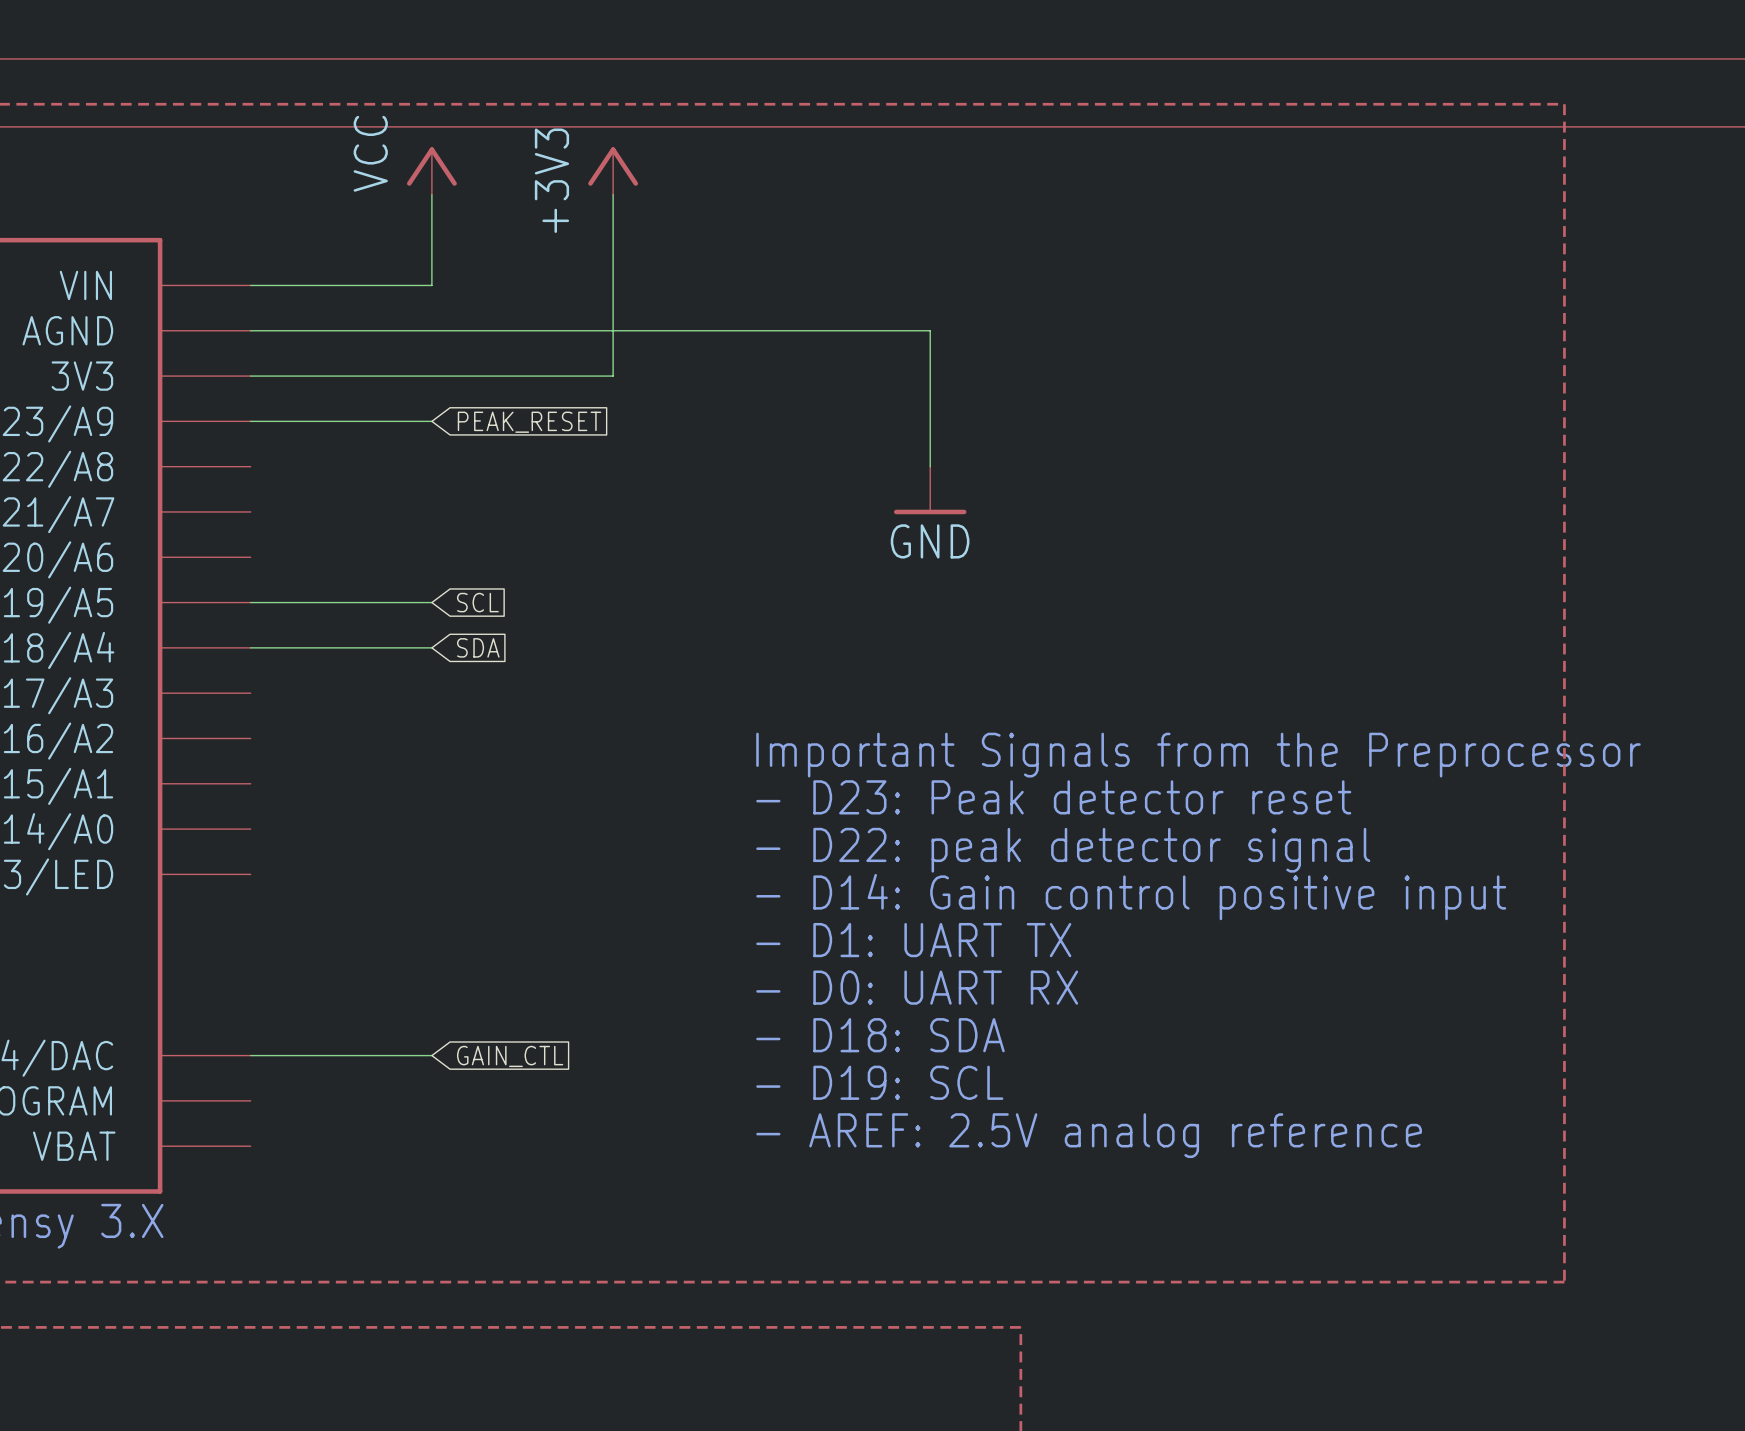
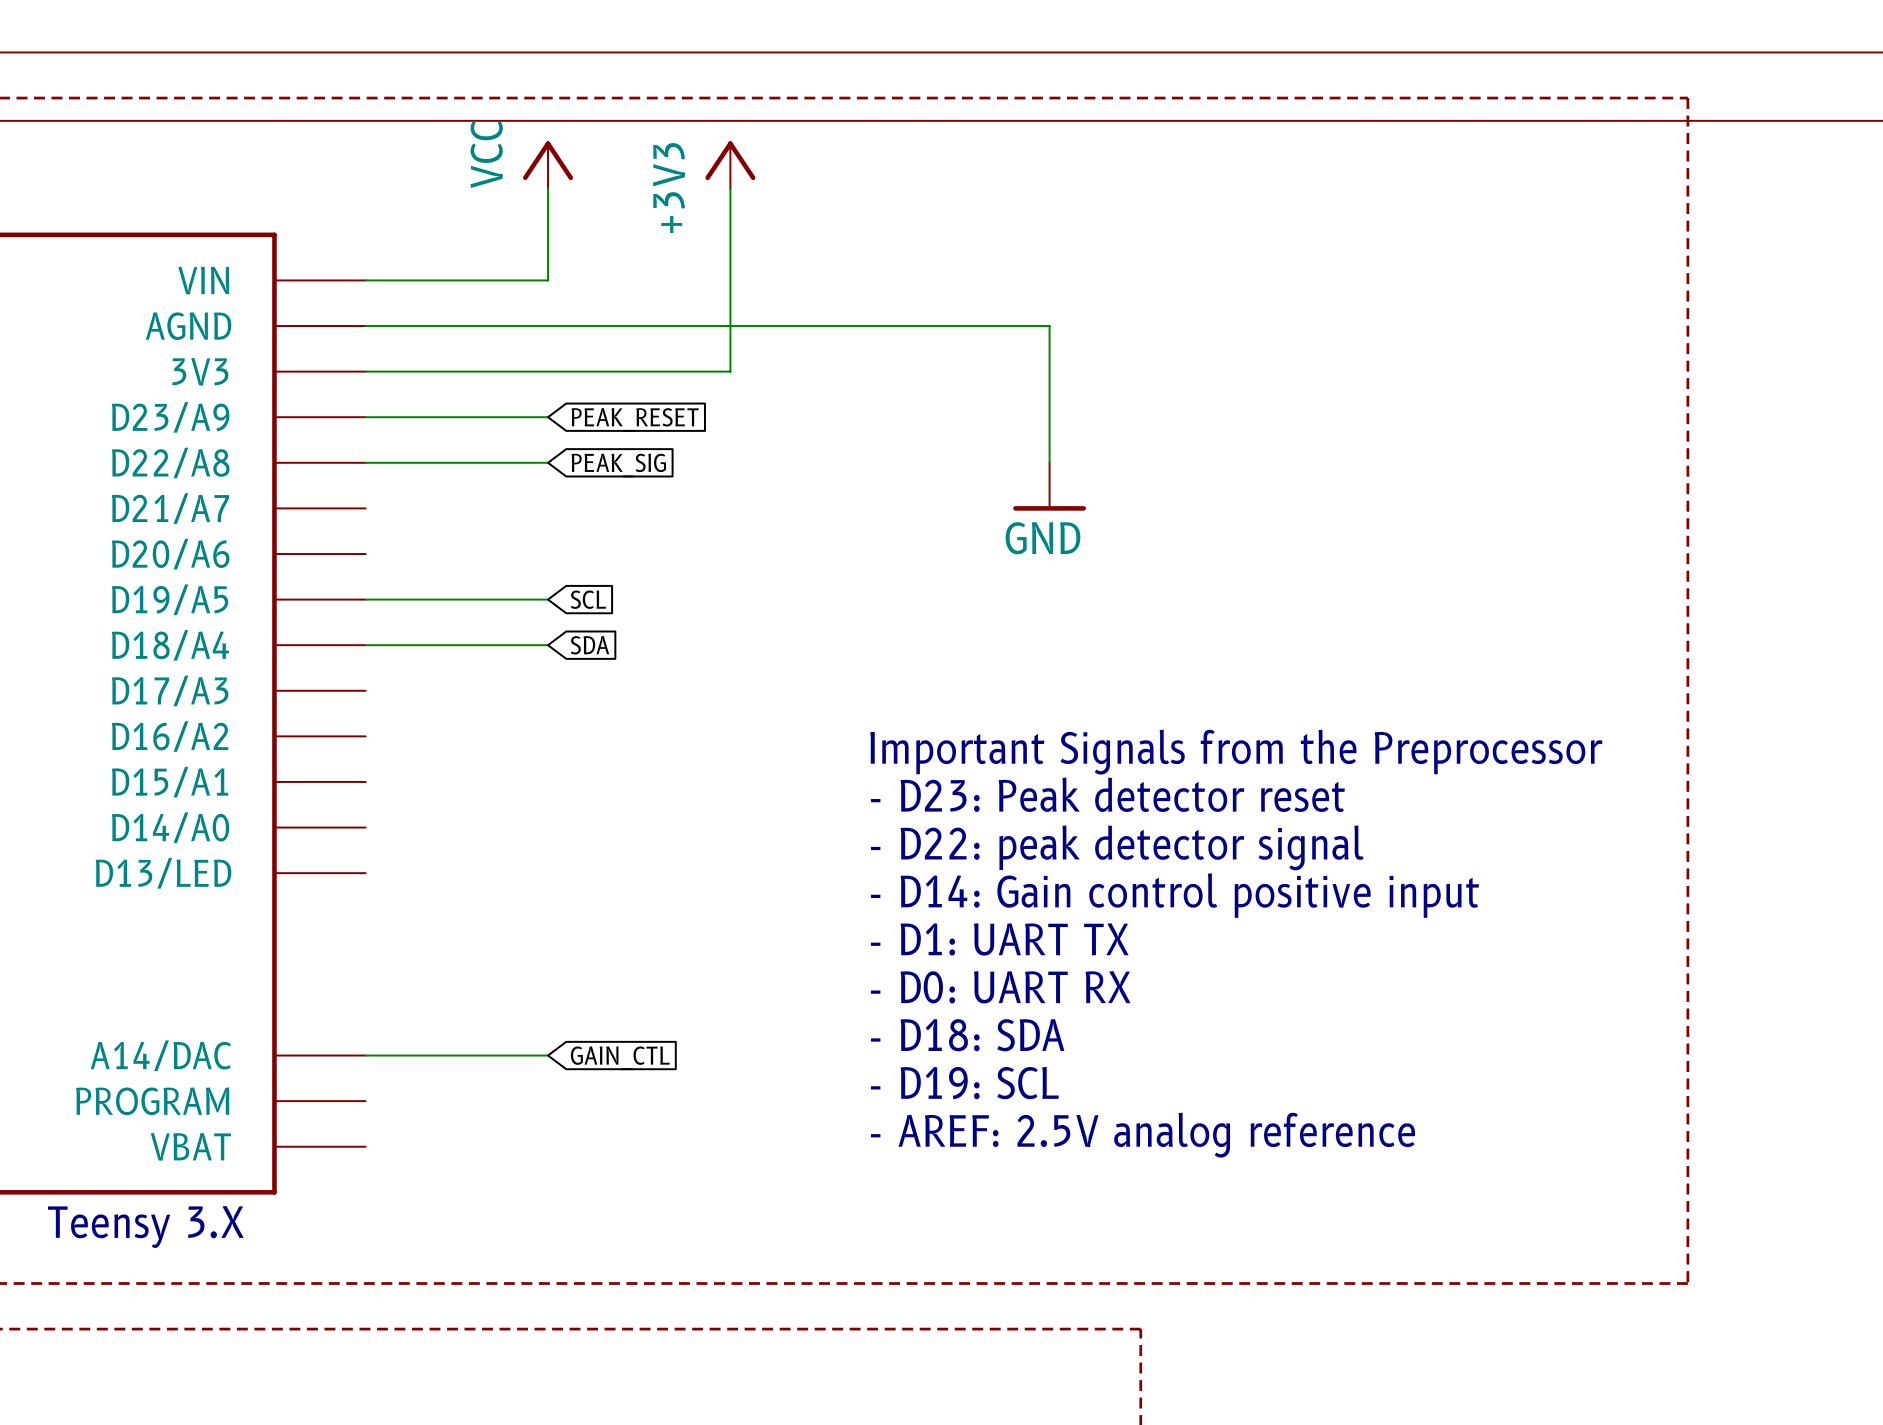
wire: none -> (365, 462) (548, 462)
global label: none -> PEAK_SIG (618, 465)

